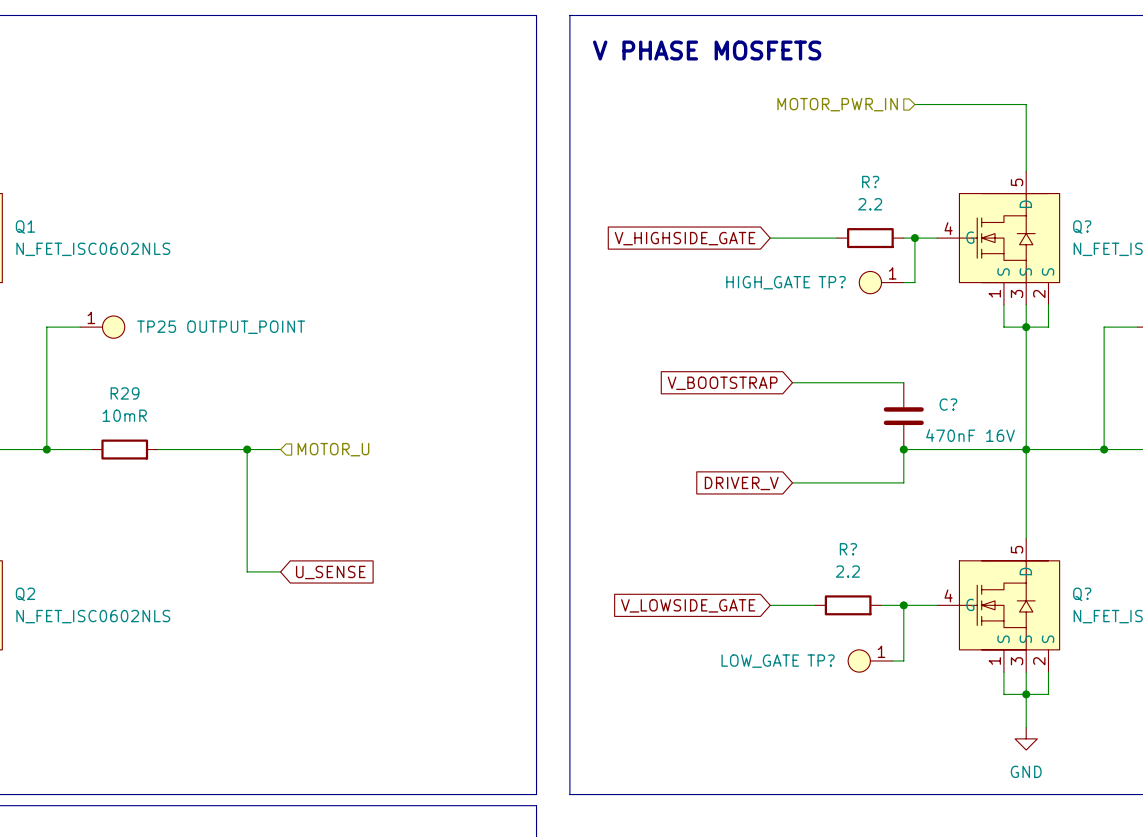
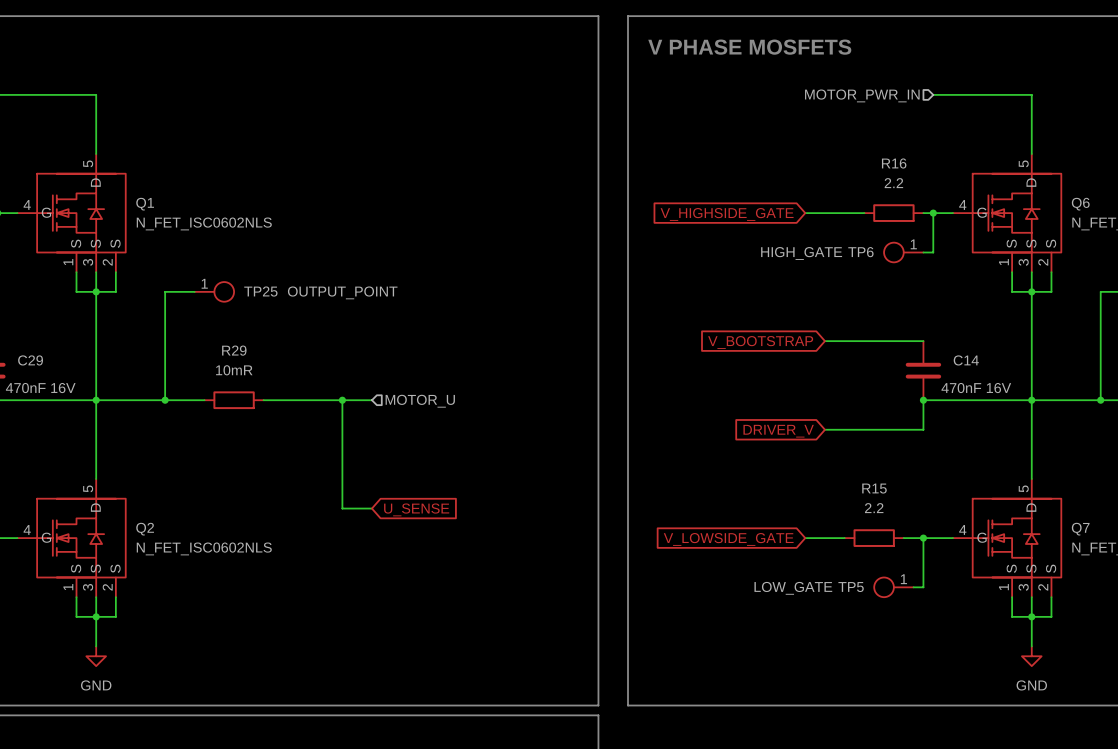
R? name: R? (870, 182) -> R16 (894, 163)
Q? name: Q? (1082, 227) -> Q6 (1080, 204)
TP? name: TP? (832, 282) -> TP6 (860, 252)
C? name: C? (948, 404) -> C14 (966, 360)
R? name: R? (848, 549) -> R15 (874, 488)
Q? name: Q? (1082, 594) -> Q7 (1080, 529)
TP? name: TP? (821, 660) -> TP5 (851, 587)

